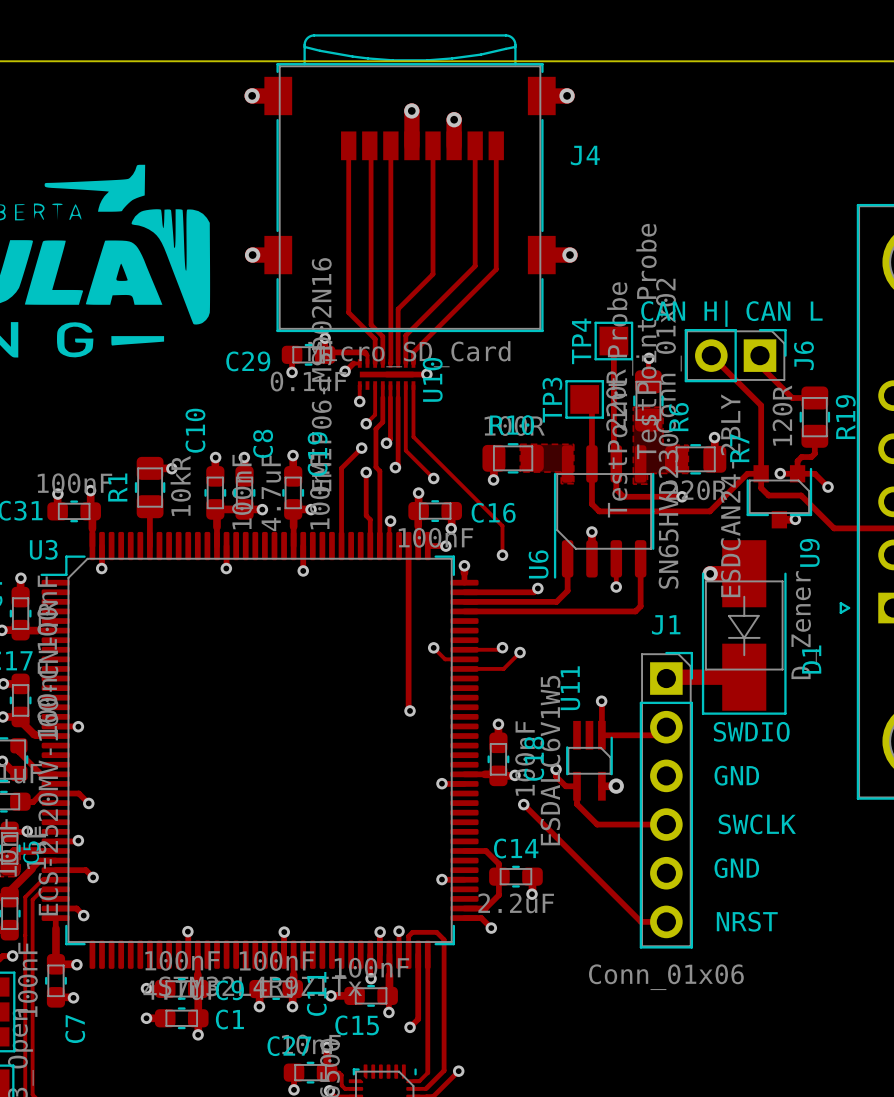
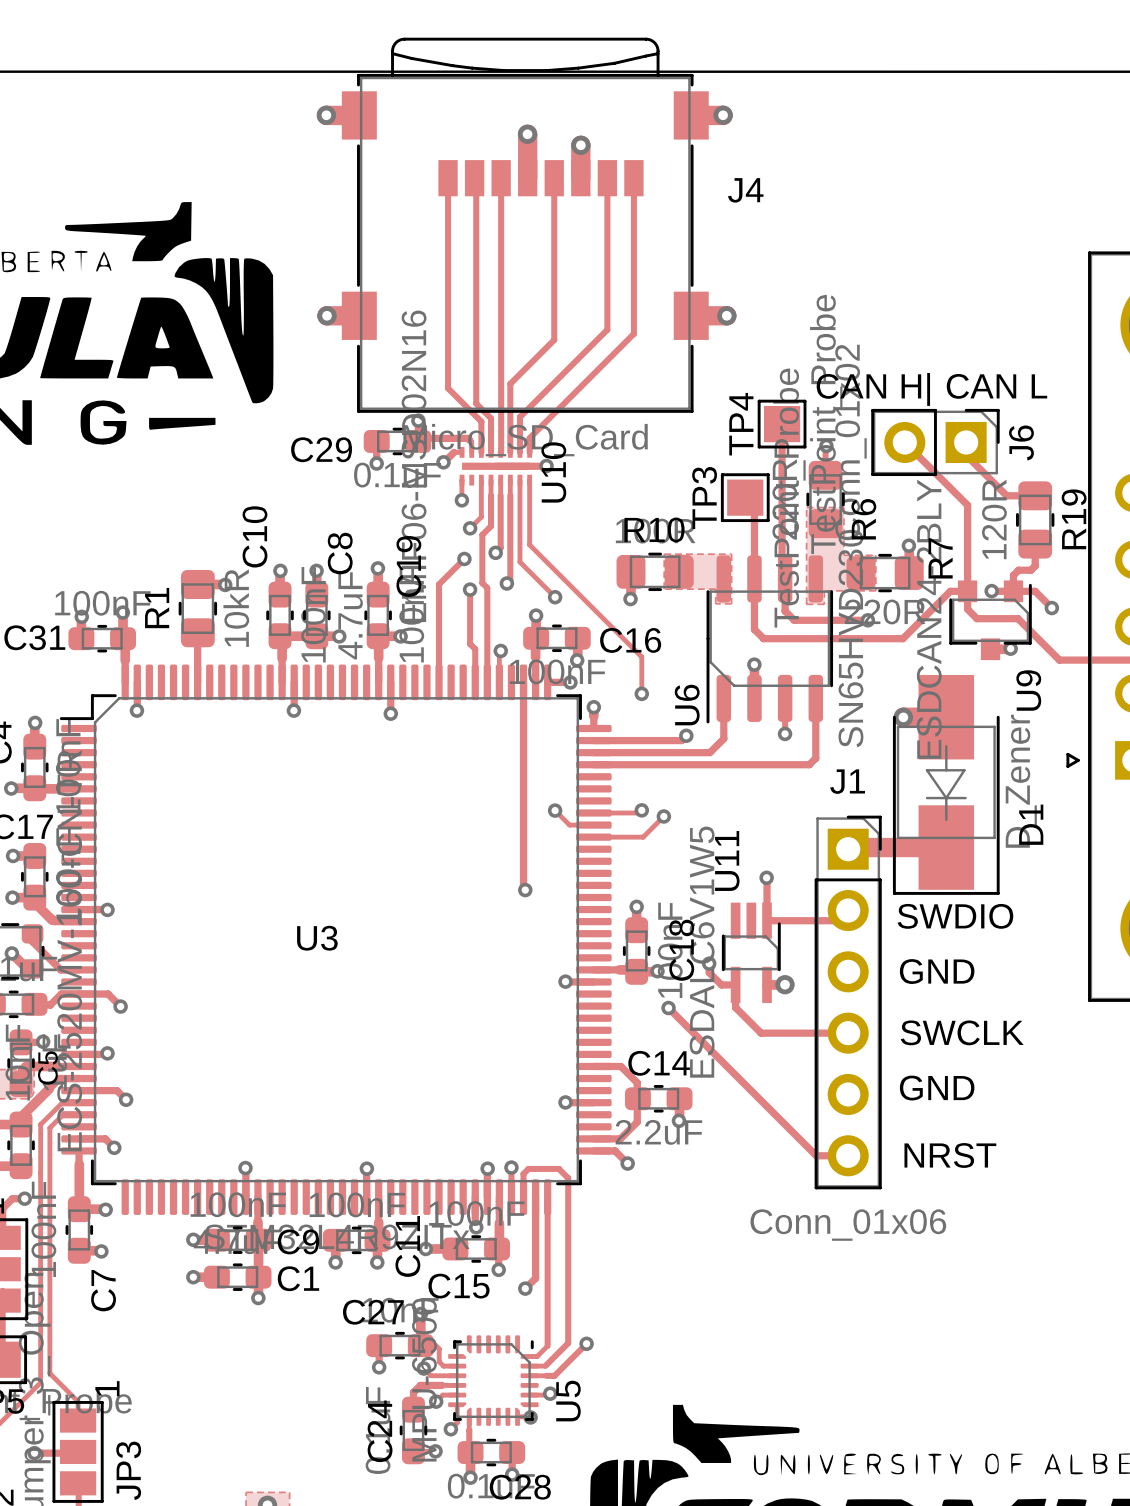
U3 name position: U3 (43, 549) -> U3 (317, 938)

